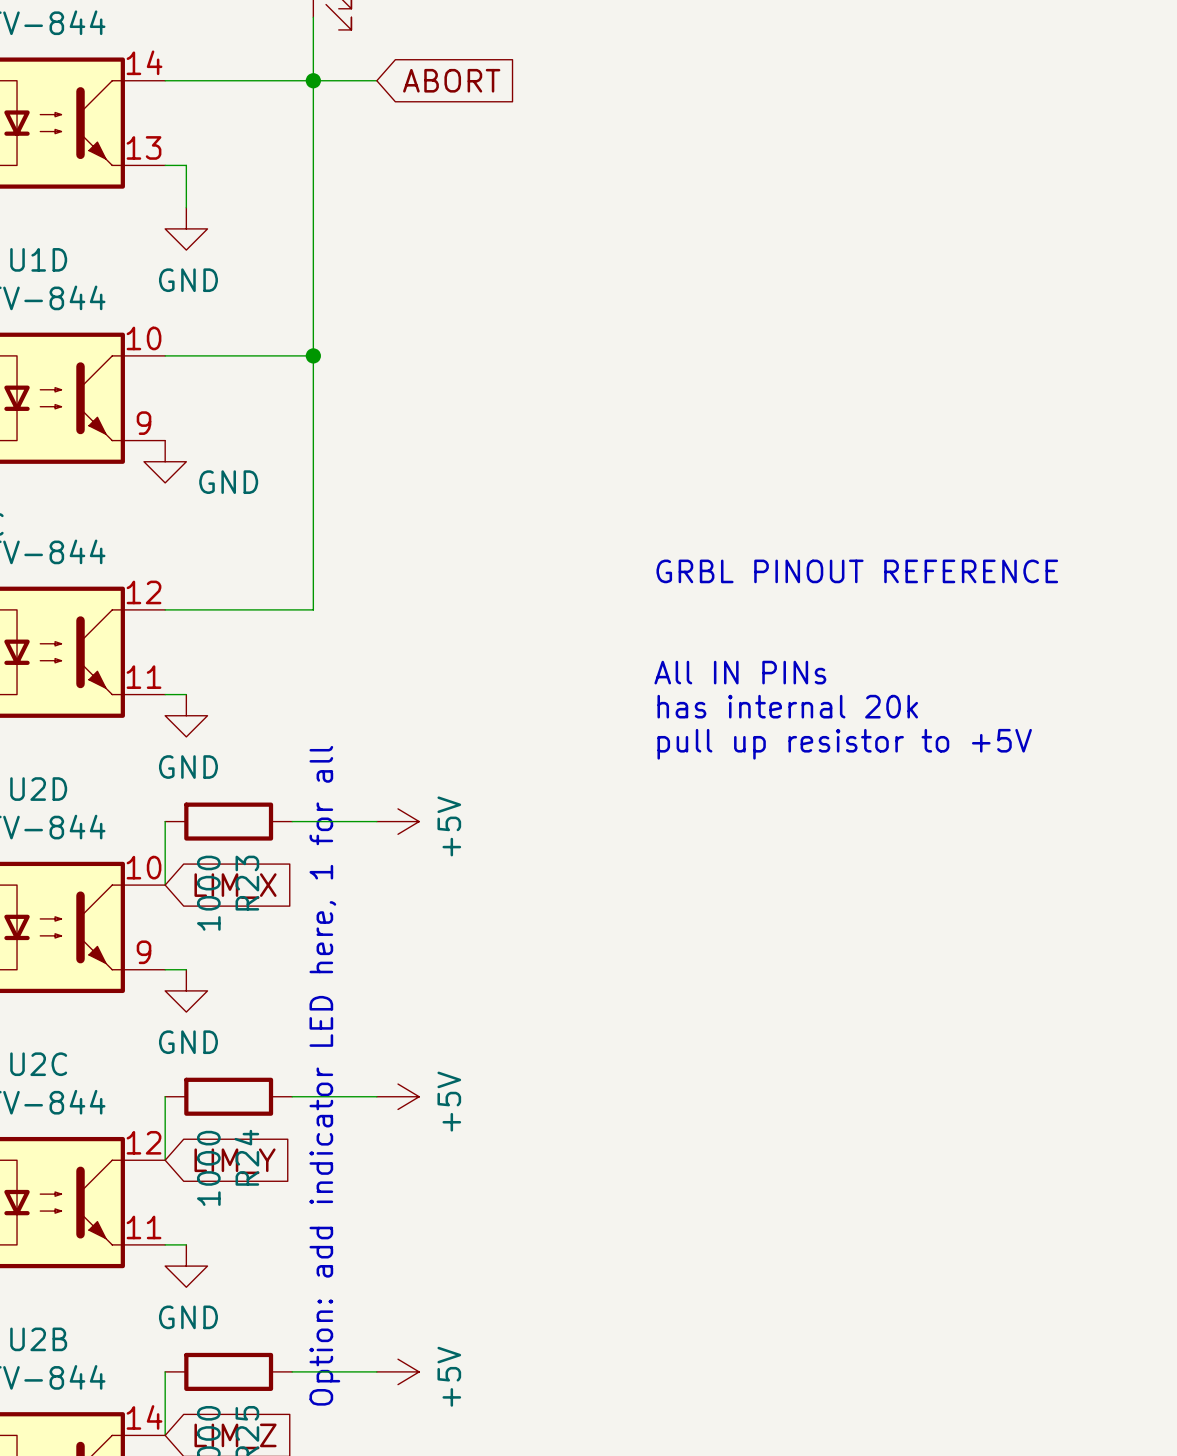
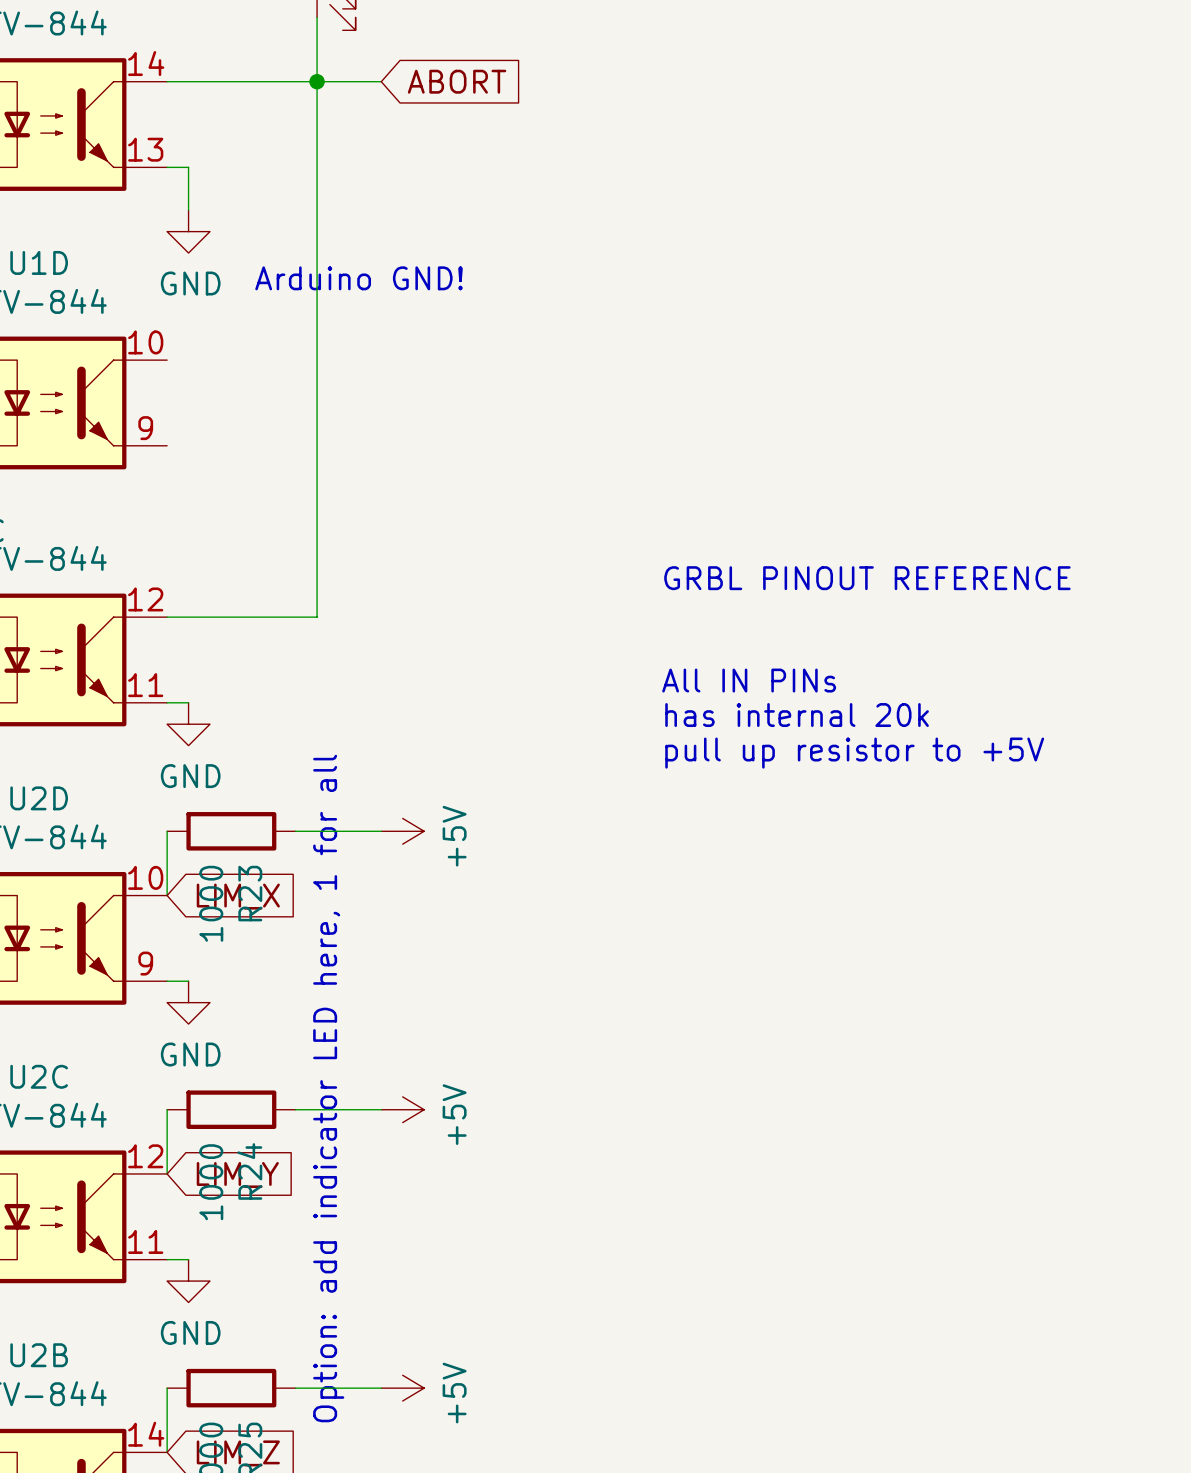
text: none -> Arduino GND! (359, 278)
wire: (165, 355) (313, 355) -> none
junction: (313, 355) -> none
power symbol: GND (165, 461) -> none

